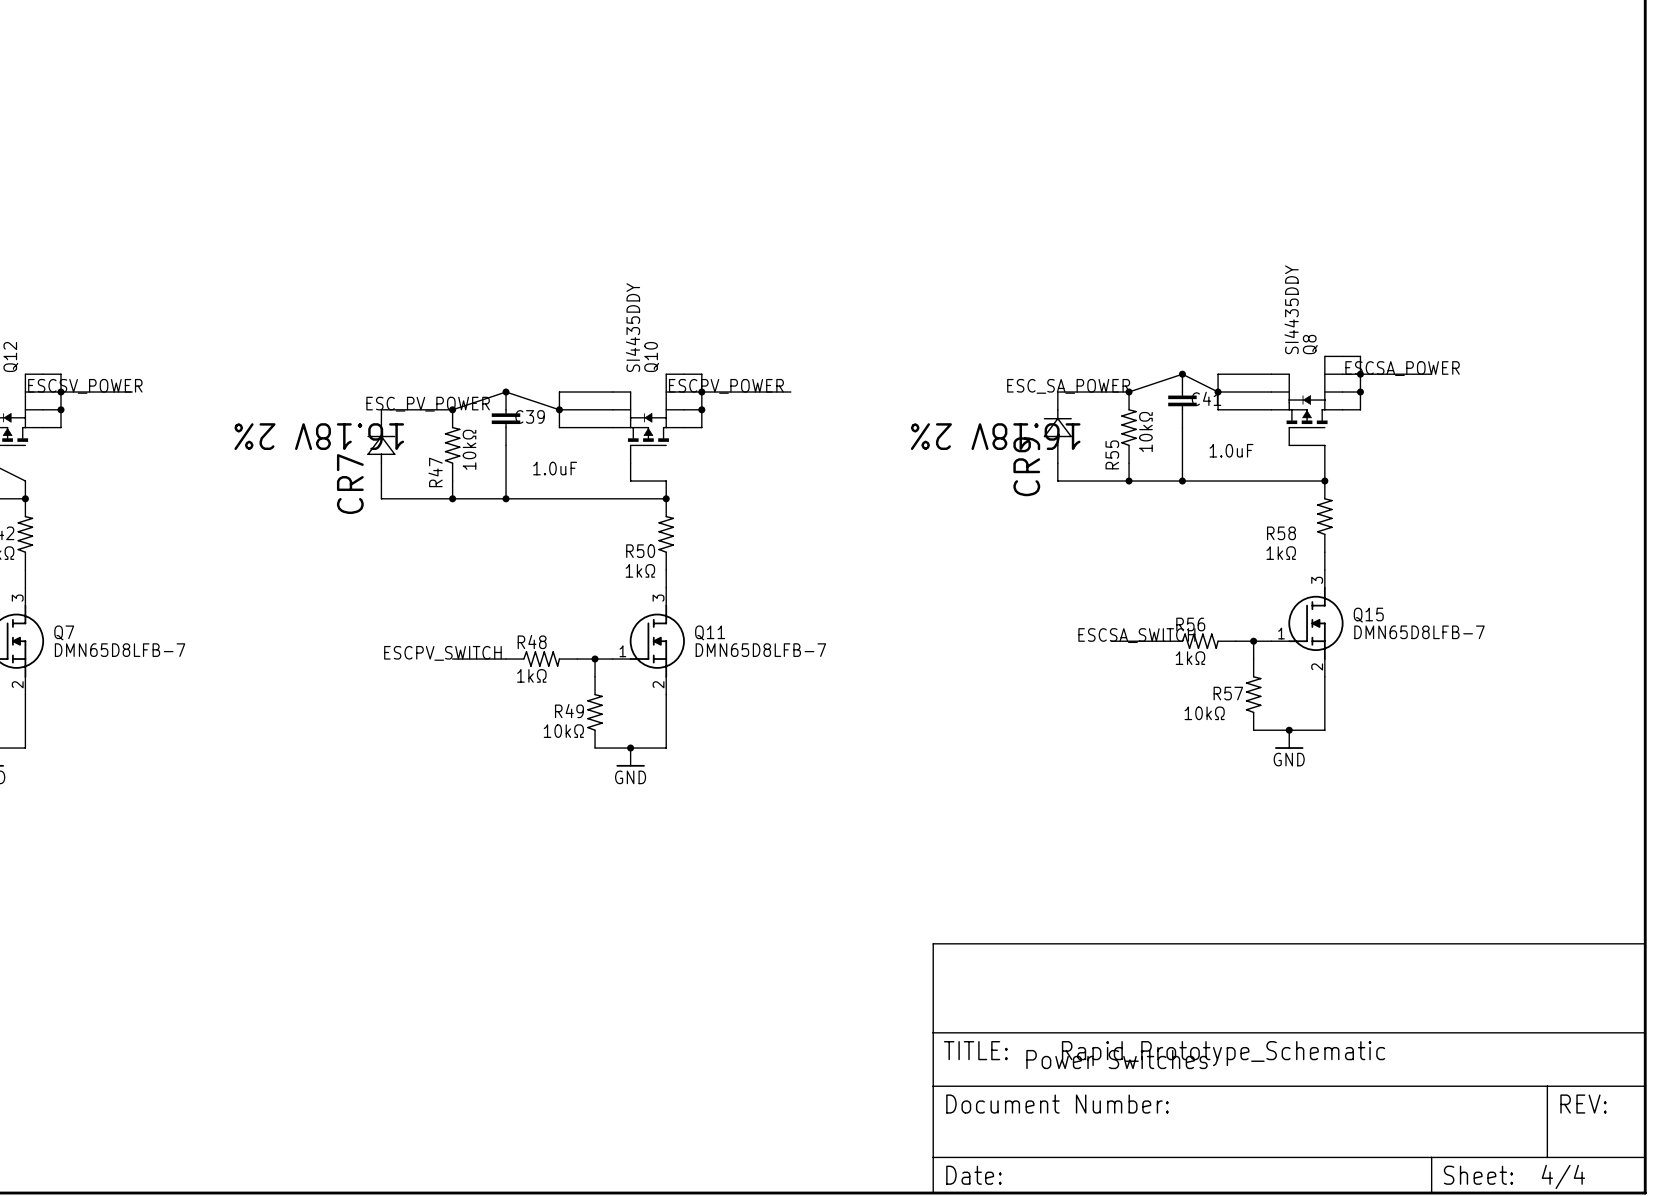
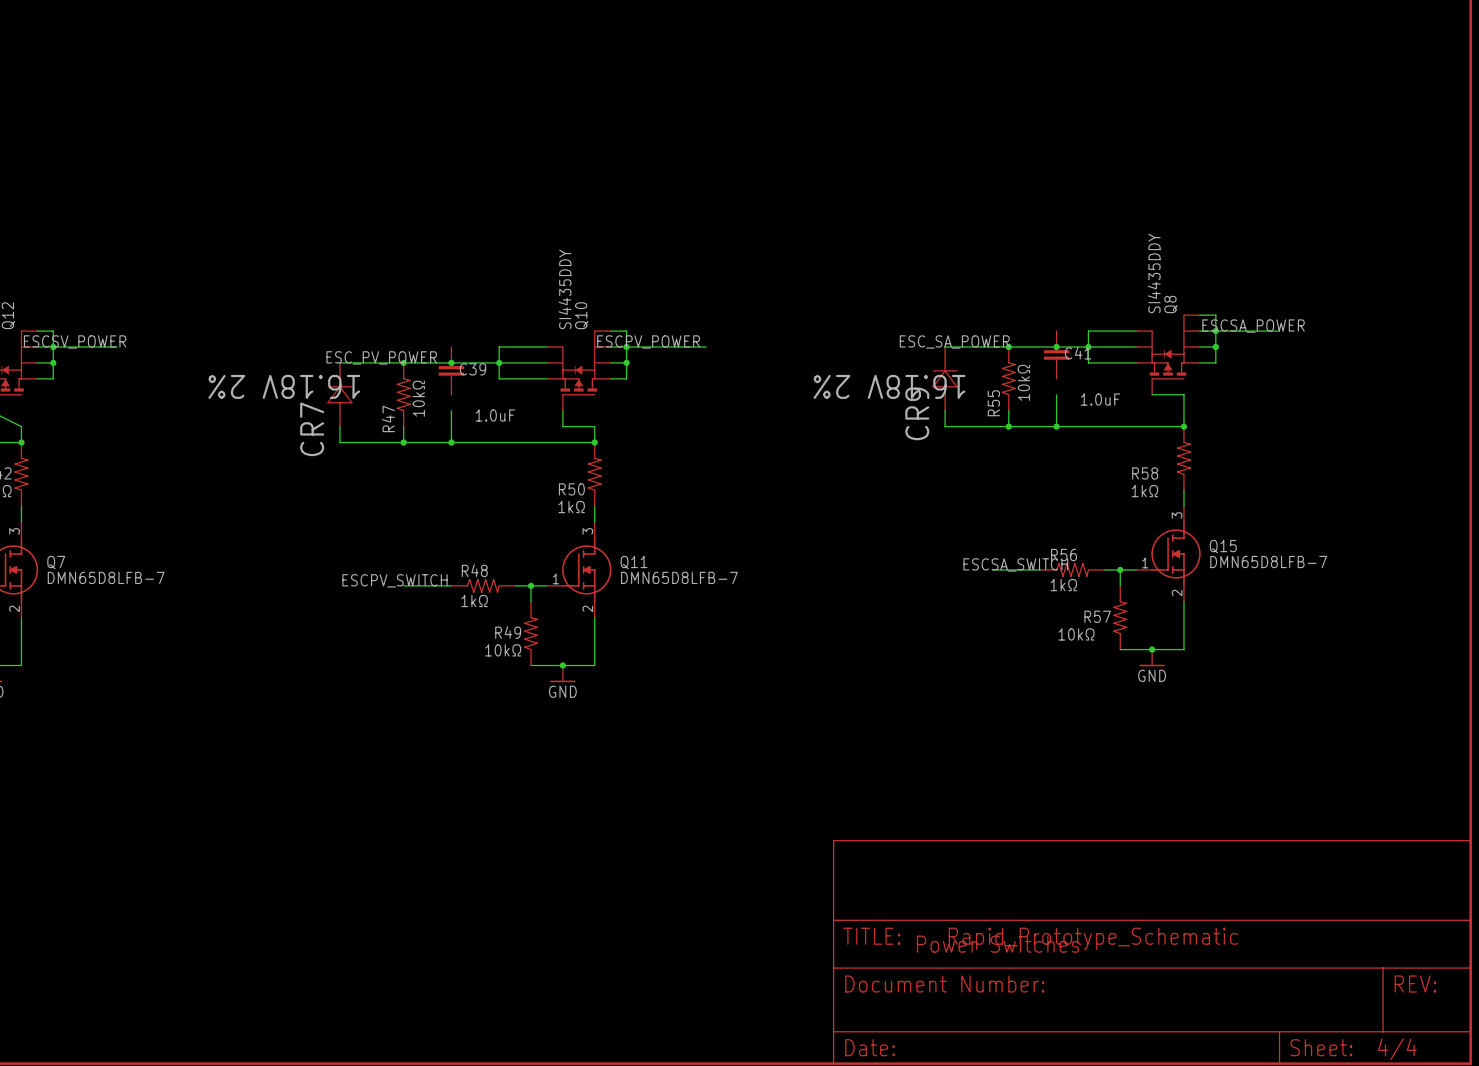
junction position: (1182, 374) -> (1056, 347)
junction position: (506, 392) -> (451, 362)
wire: (1129, 392) (1182, 374) (1218, 392) -> (1008, 347) (1088, 347)
wire: (452, 409) (506, 392) (559, 409) -> (403, 362) (499, 362)
wire: (1182, 427) (1182, 445) -> none
wire: (506, 445) (506, 463) -> none

